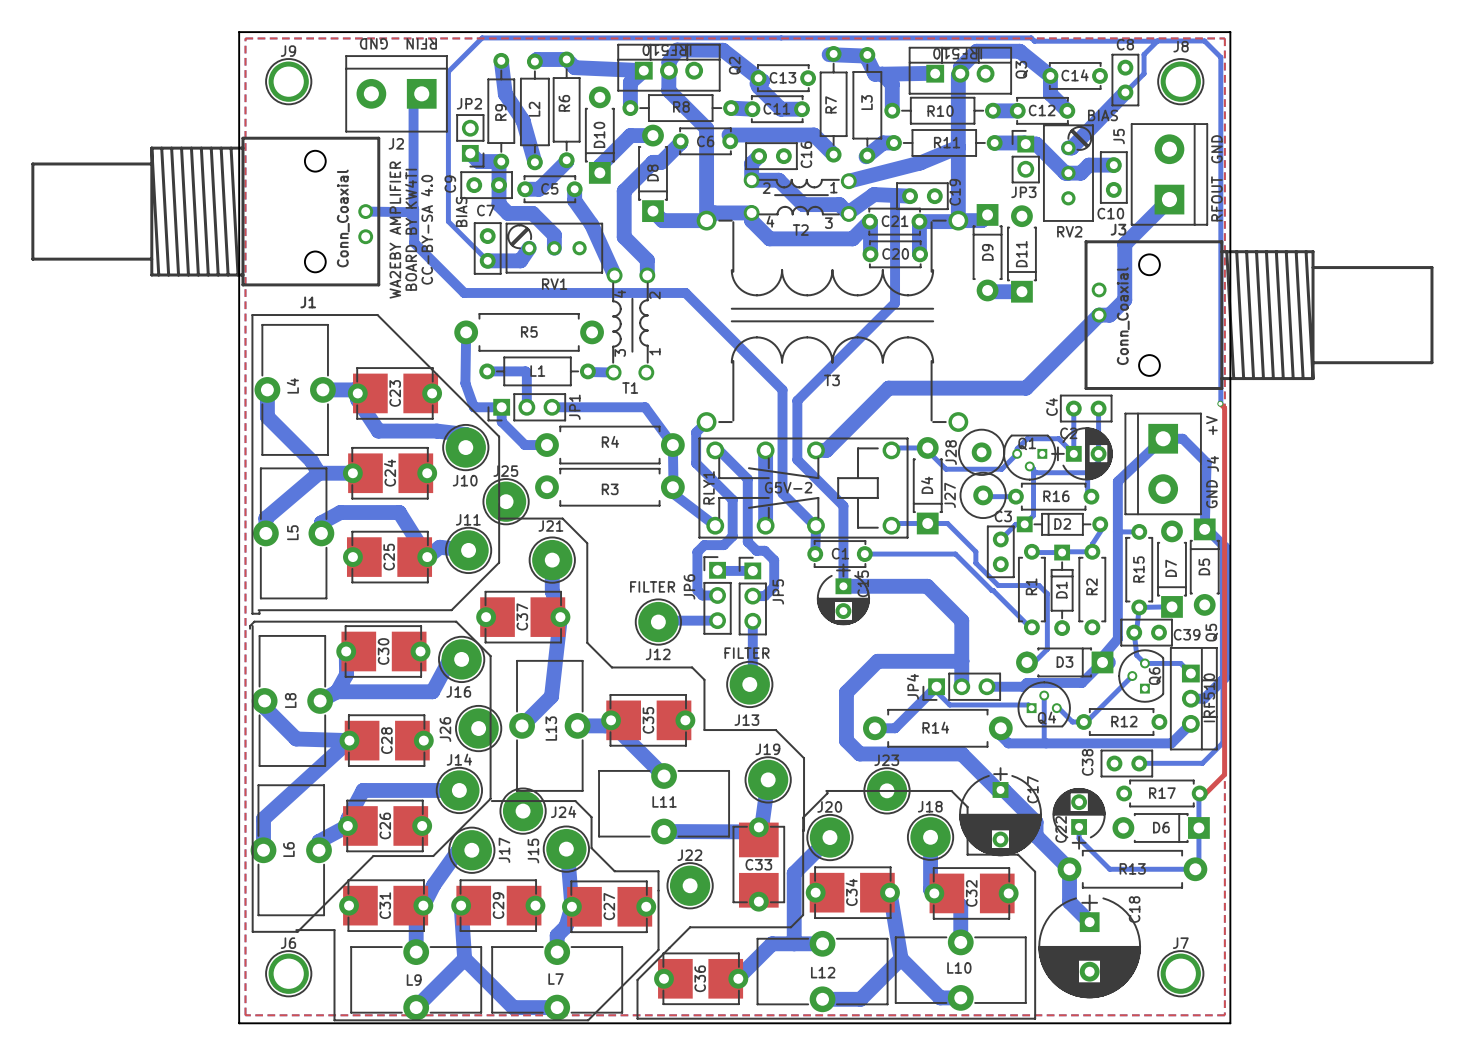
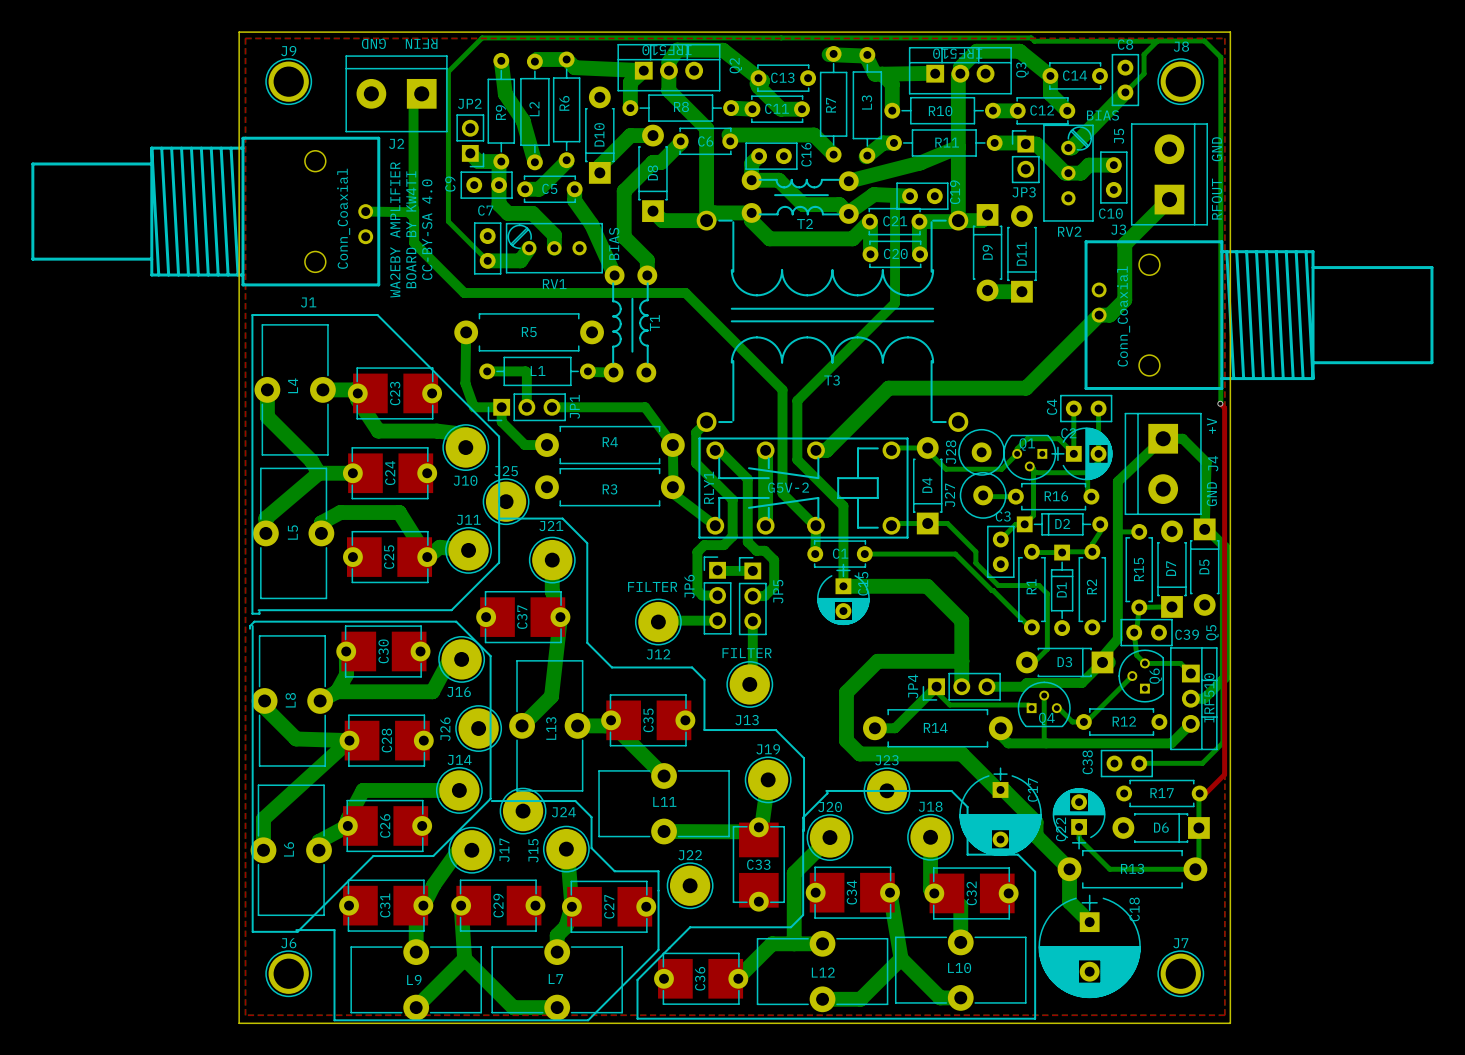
T2 footprint: [743, 172, 857, 222] -> [741, 170, 859, 224]
text position: BIAS (461, 211) -> BIAS (614, 243)
T1 footprint: [605, 267, 656, 381] -> [603, 265, 658, 383]
T1 name position: T1 (630, 388) -> T1 (654, 323)

